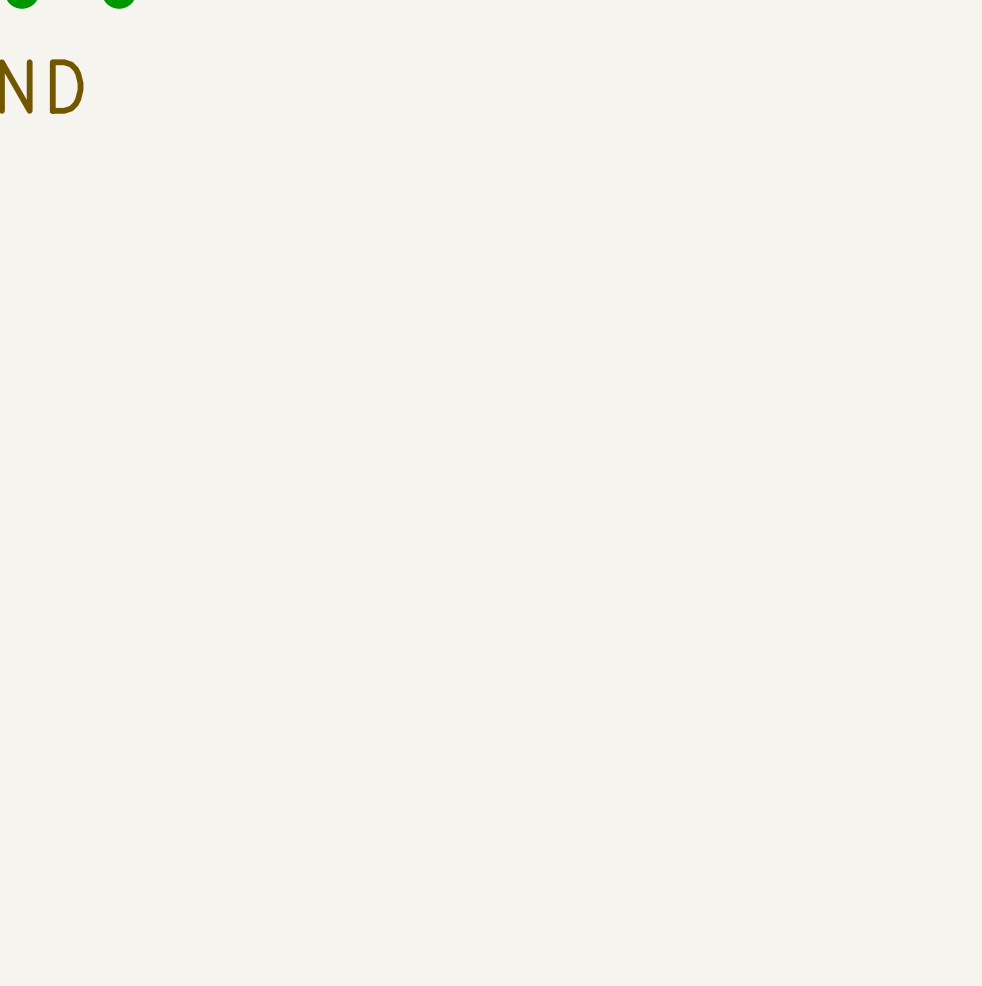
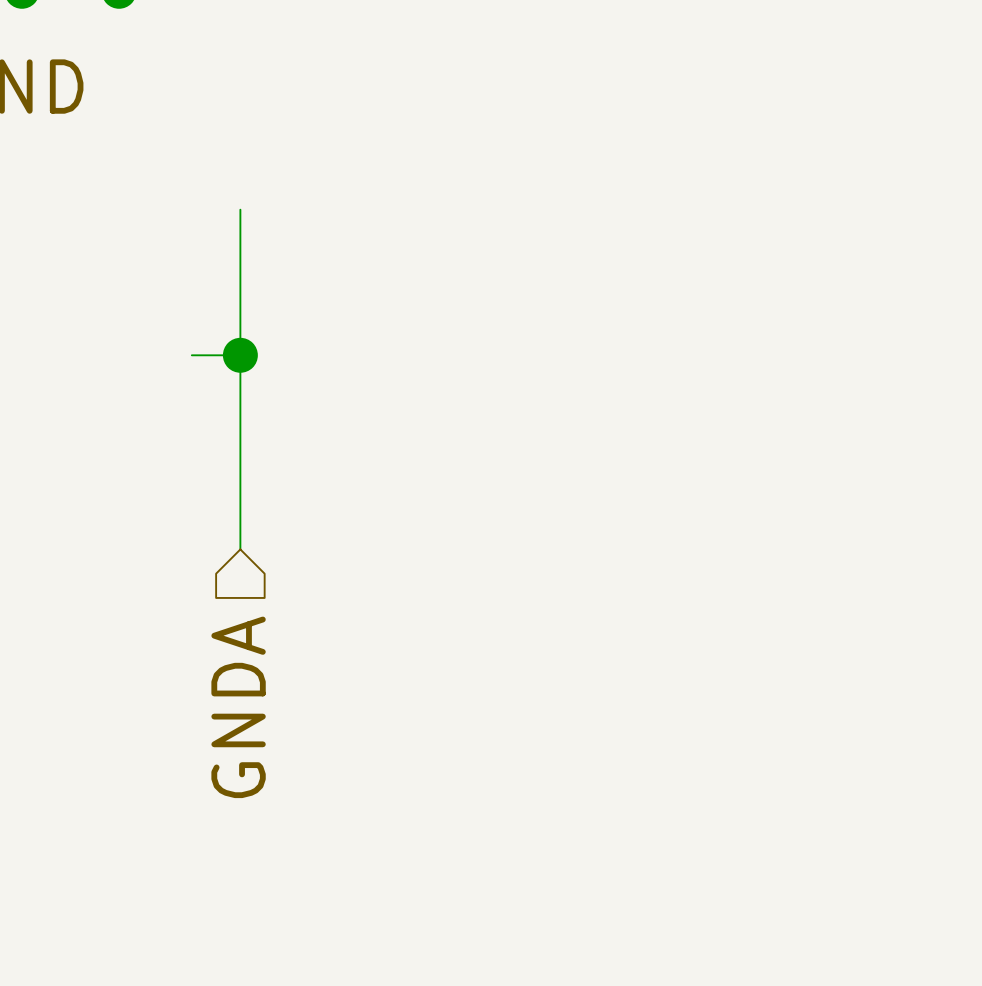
wire: none -> (240, 209) (240, 549)
wire: none -> (191, 355) (240, 355)
junction: none -> (240, 355)
hierarchical label: none -> GNDA (238, 707)

